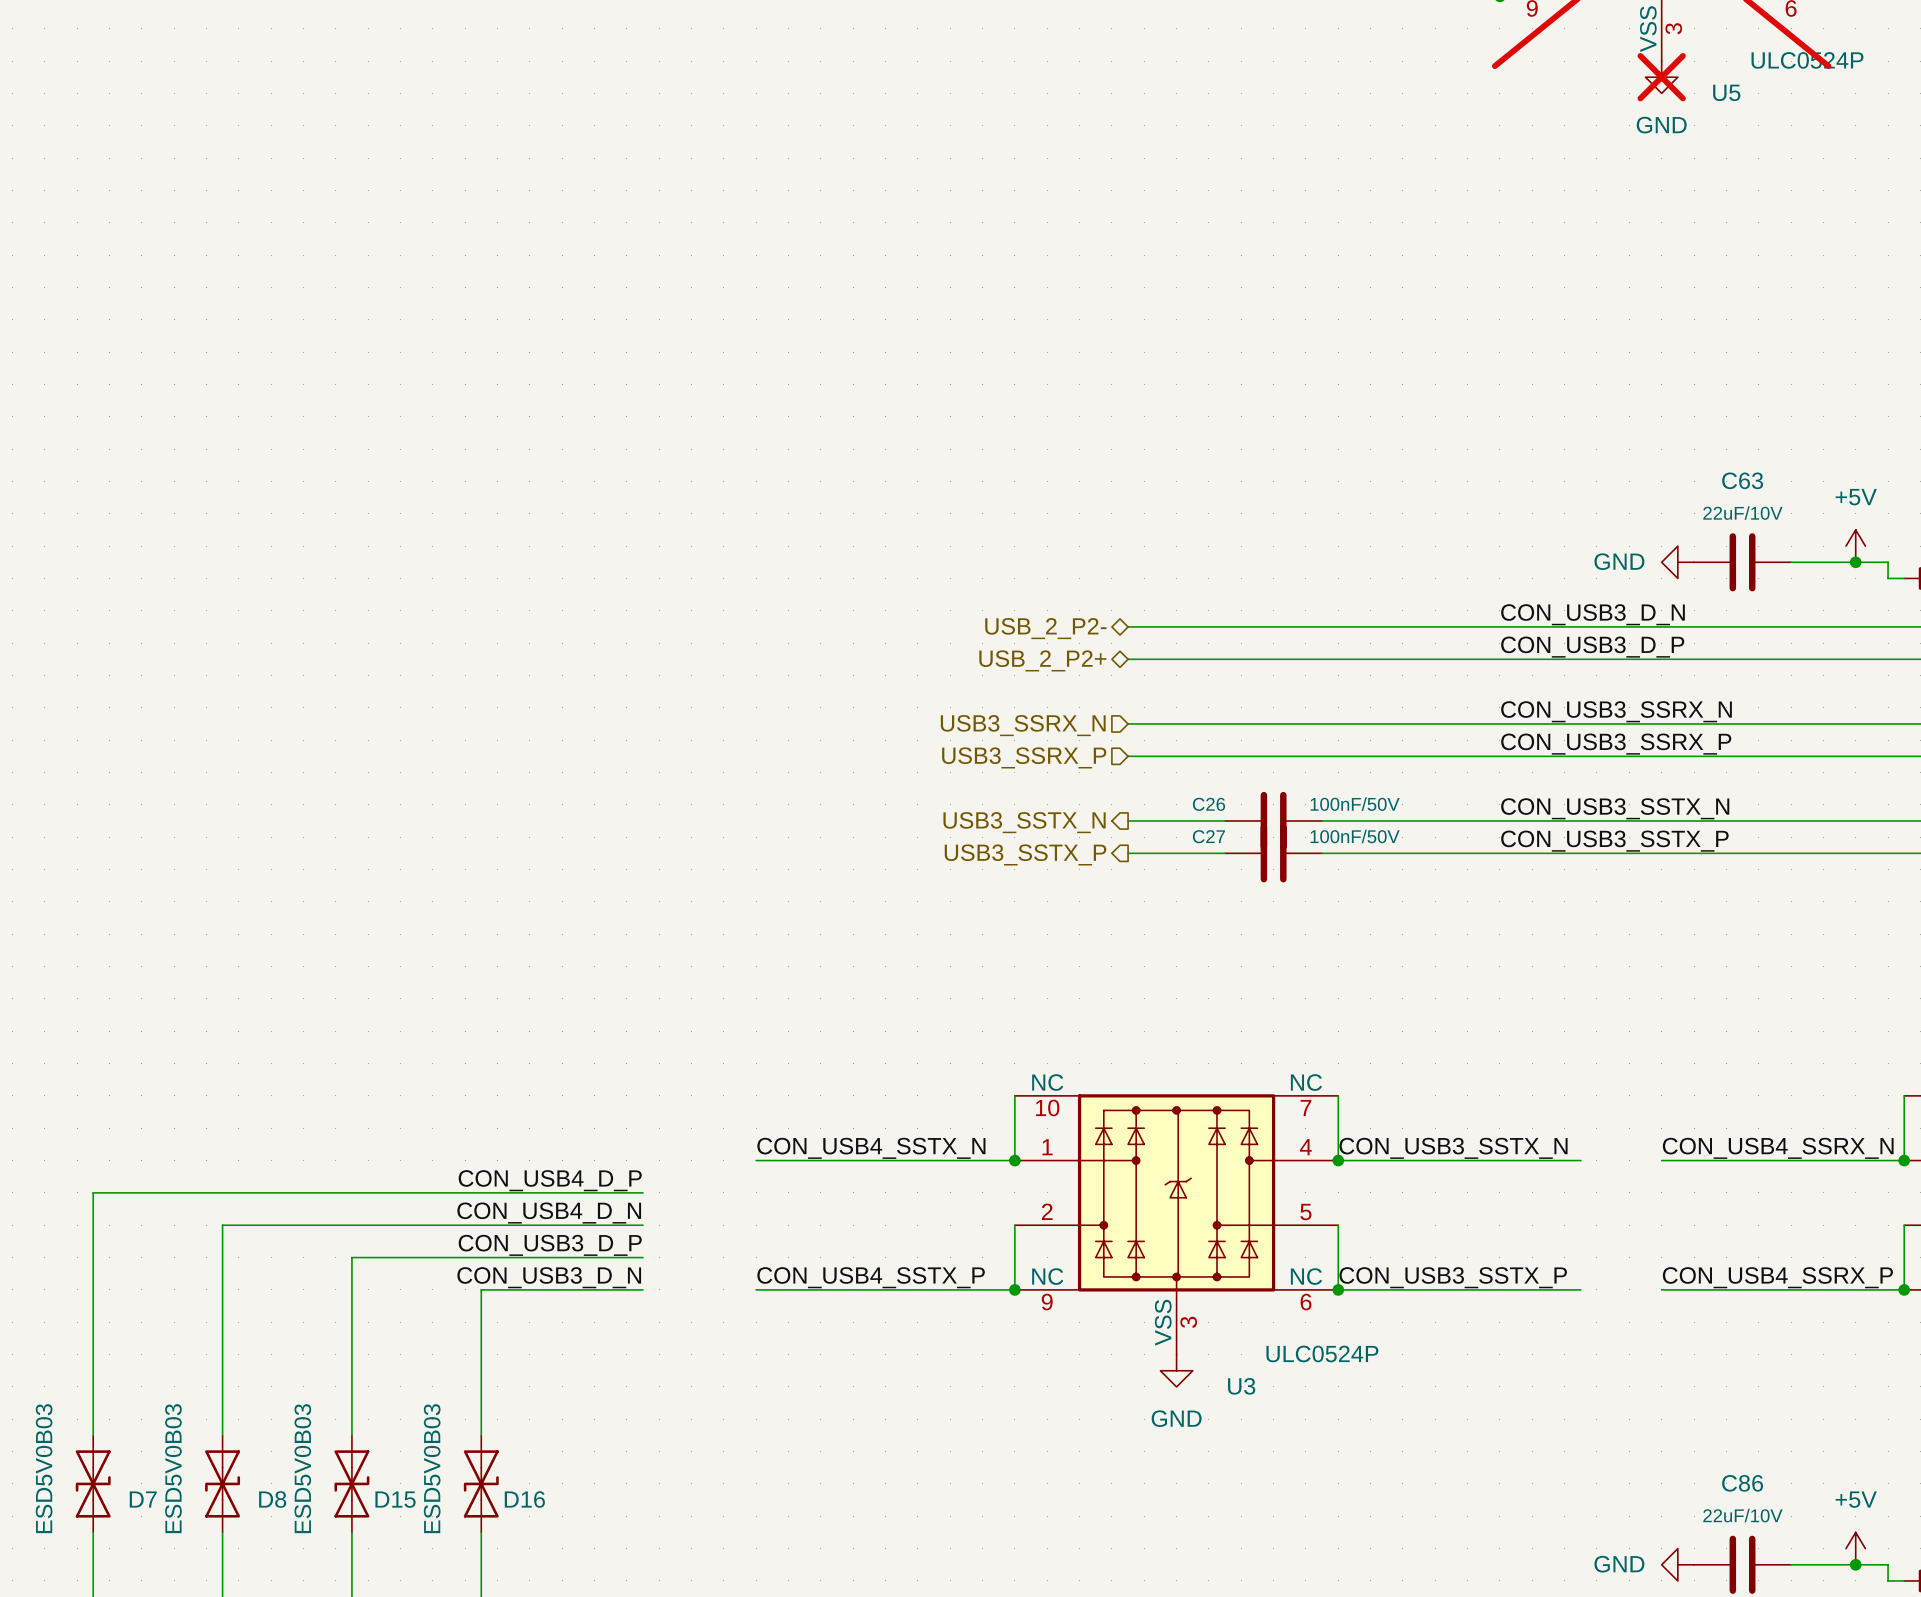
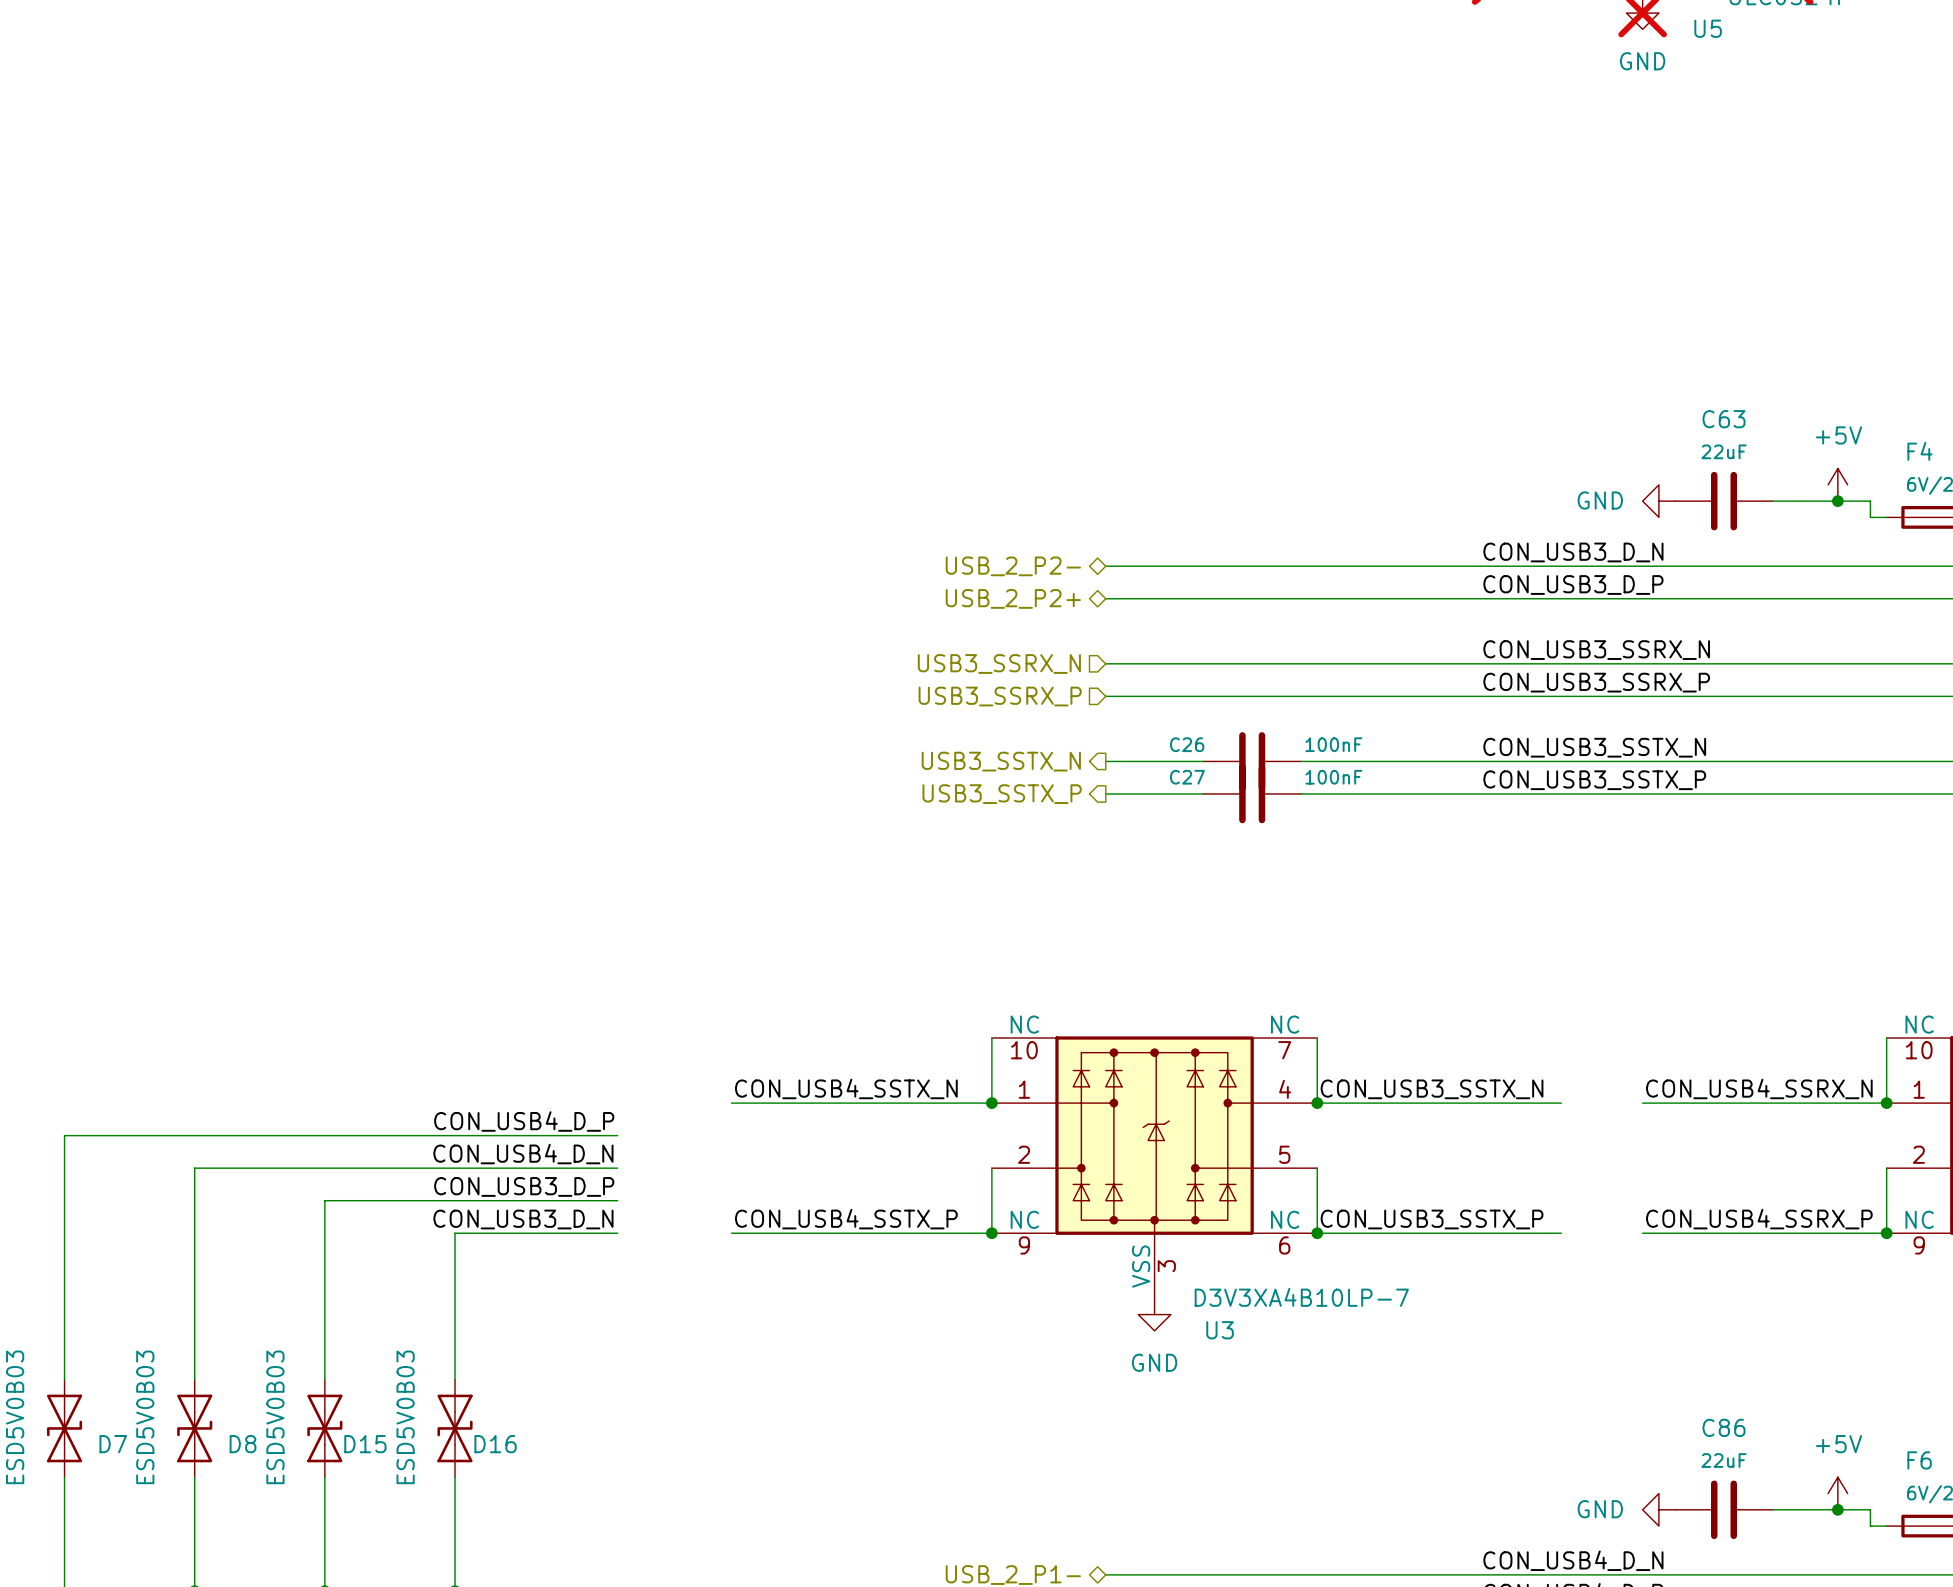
C63 value: 22uF/10V (1742, 513) -> 22uF (1723, 451)
C26 value: 100nF/50V (1355, 804) -> 100nF (1333, 744)
C27 value: 100nF/50V (1355, 836) -> 100nF (1333, 777)
U3 value: ULC0524P (1322, 1353) -> D3V3XA4B10LP-7 (1301, 1297)
C86 value: 22uF/10V (1742, 1515) -> 22uF (1723, 1460)

